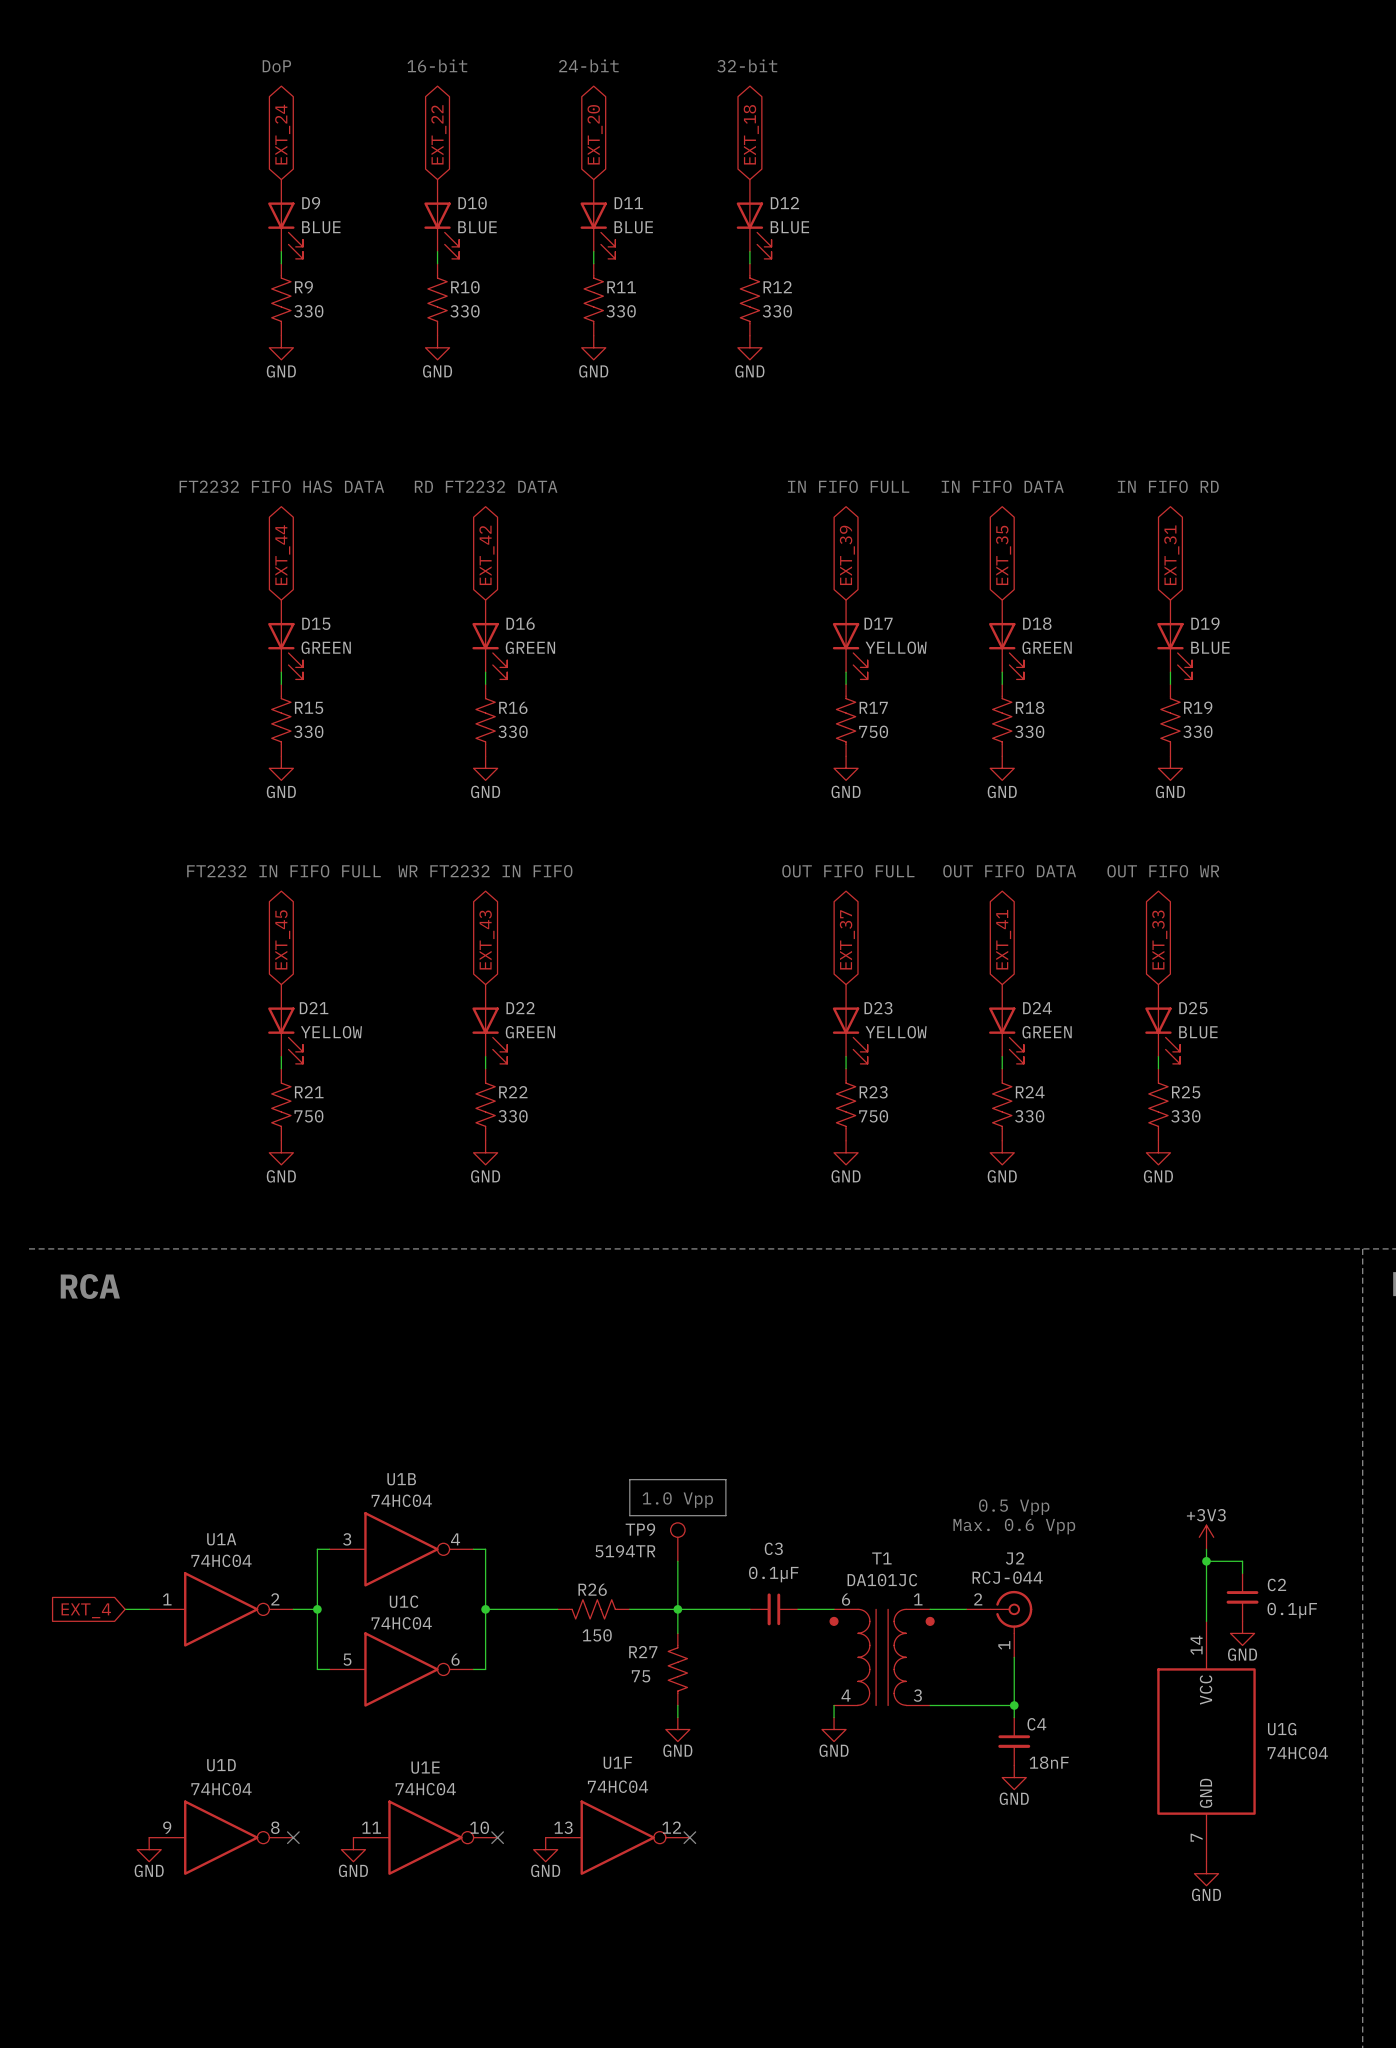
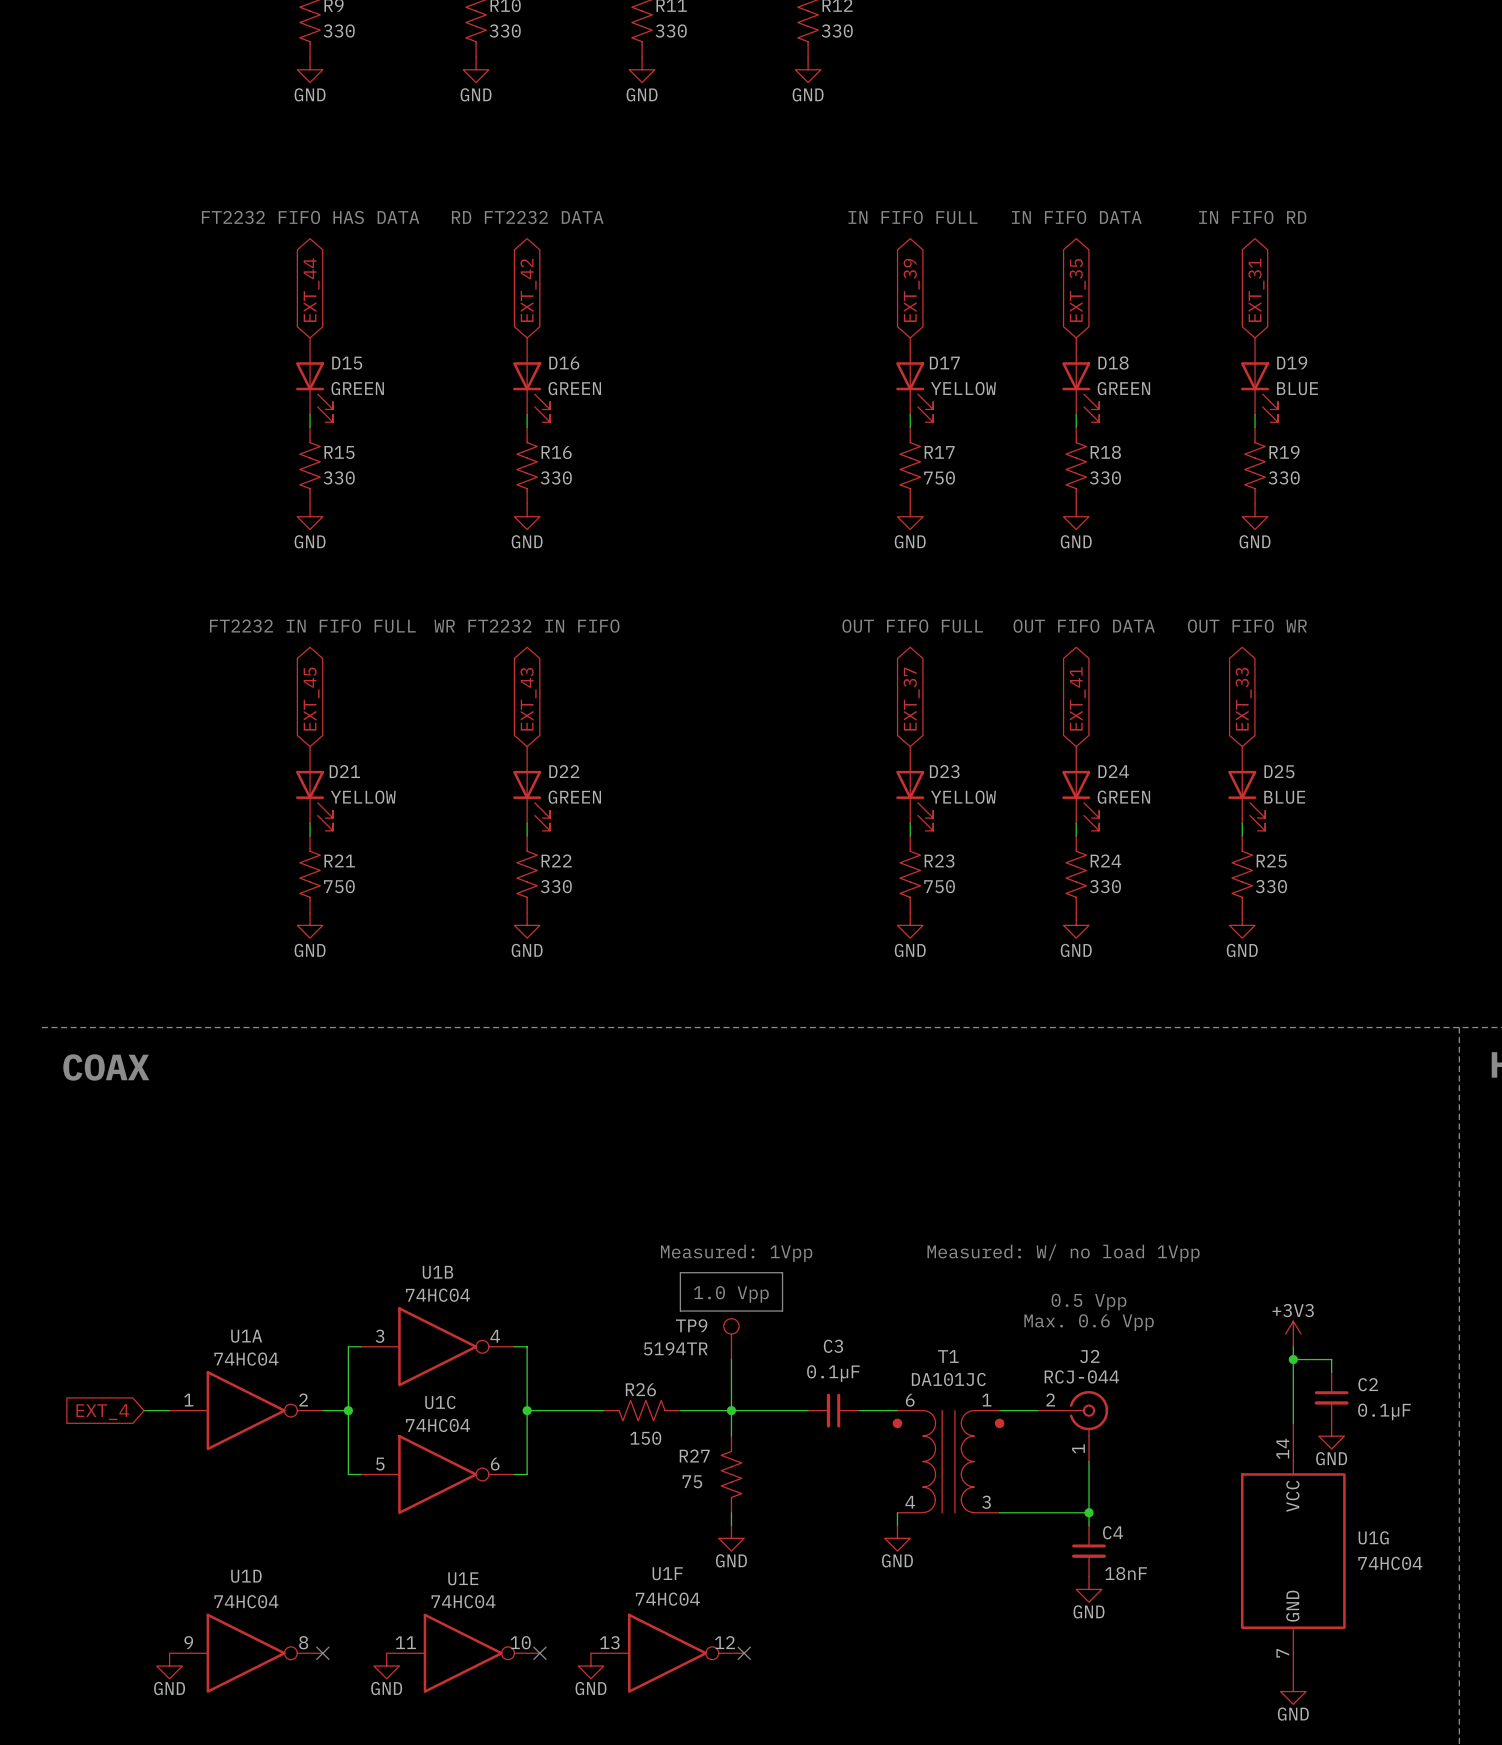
text: RCA (90, 1286) -> COAX (106, 1067)
text: none -> Measured: 1Vpp (736, 1253)
text: none -> Measured: W/ no load 1Vpp (1063, 1253)

